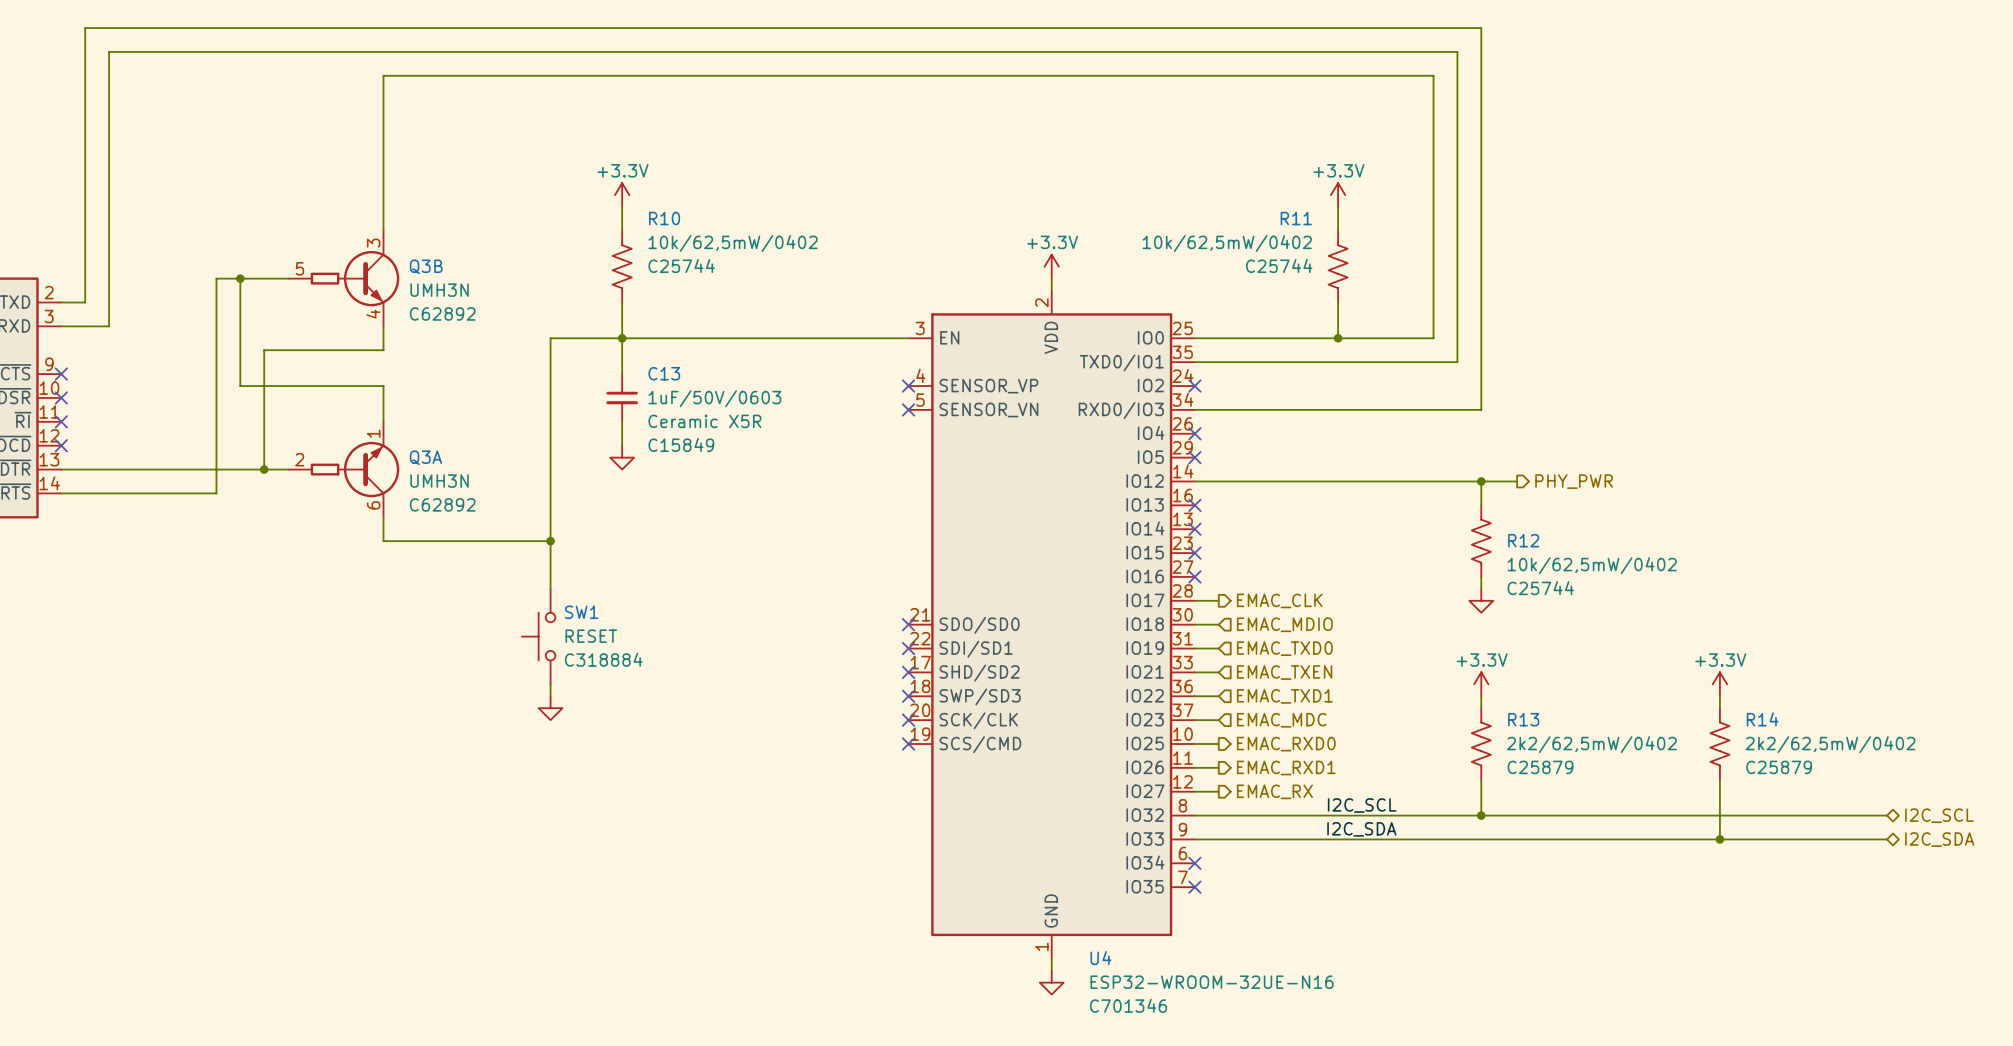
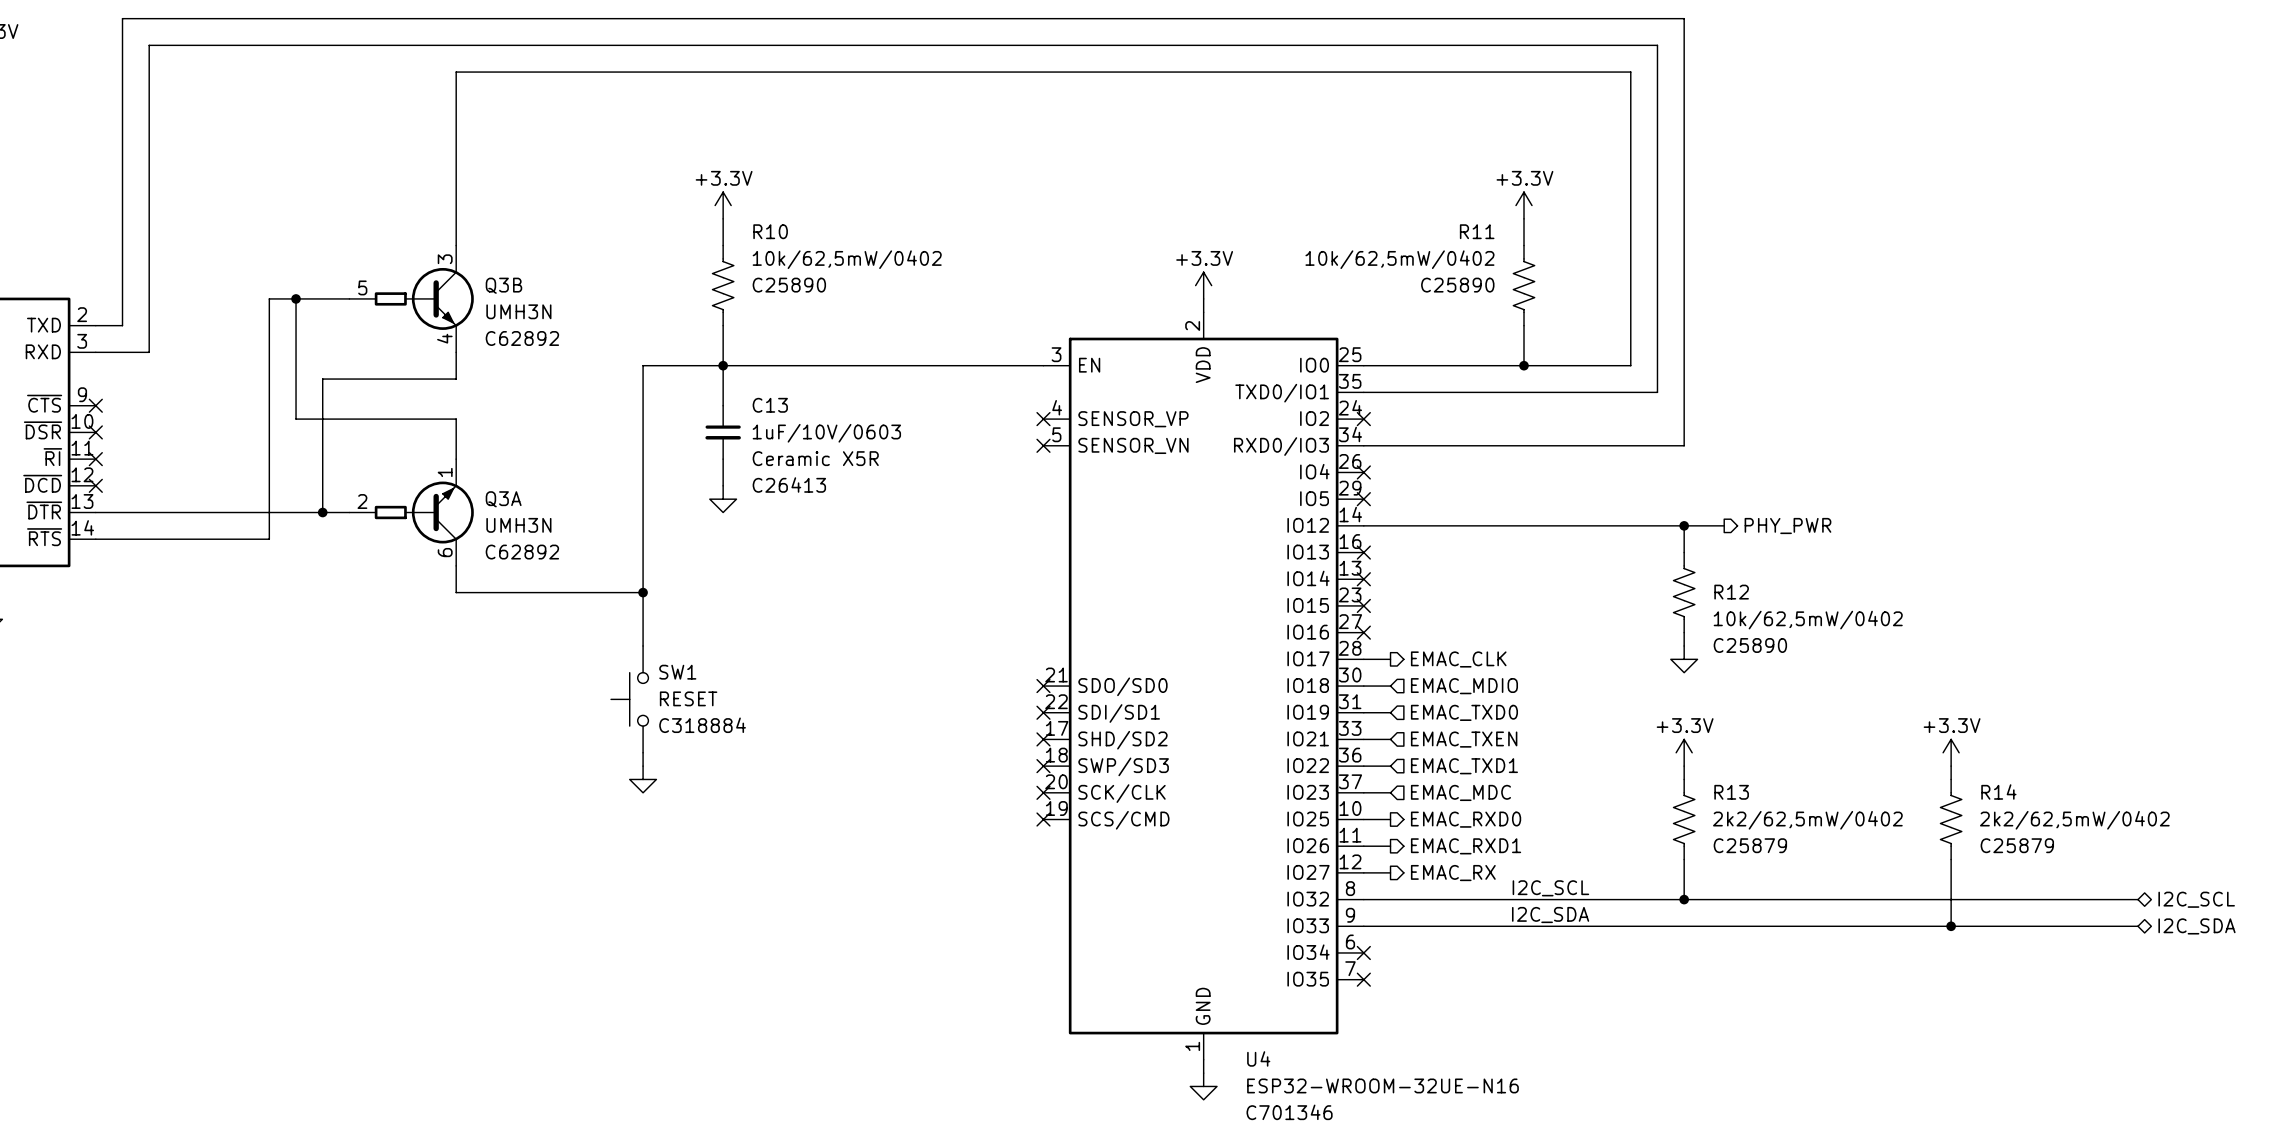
R10 text: C25744 (681, 265) -> C25890 (789, 285)
R11 text: C25744 (1279, 265) -> C25890 (1457, 285)
C13 value: 1uF/50V/0603 (714, 398) -> 1uF/10V/0603 (826, 433)
C13 text: C15849 (681, 444) -> C26413 (789, 485)
R12 text: C25744 (1540, 588) -> C25890 (1750, 645)

